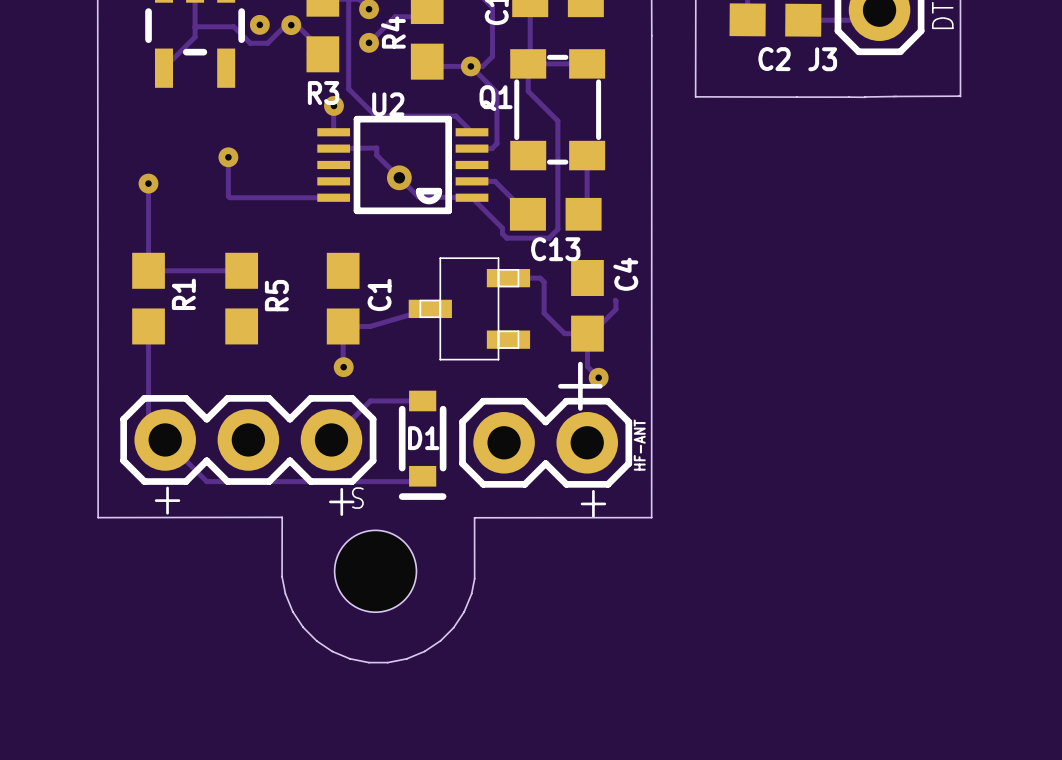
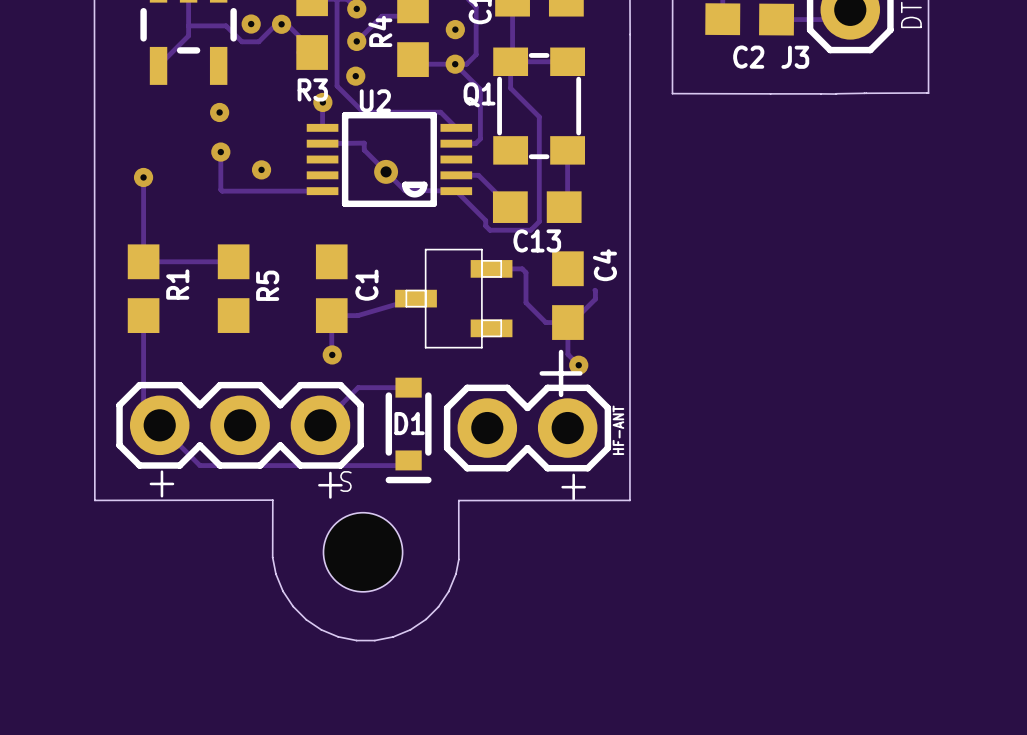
via: none -> (455, 29)
via: none -> (355, 76)
via: none -> (219, 112)
via: none -> (261, 169)

